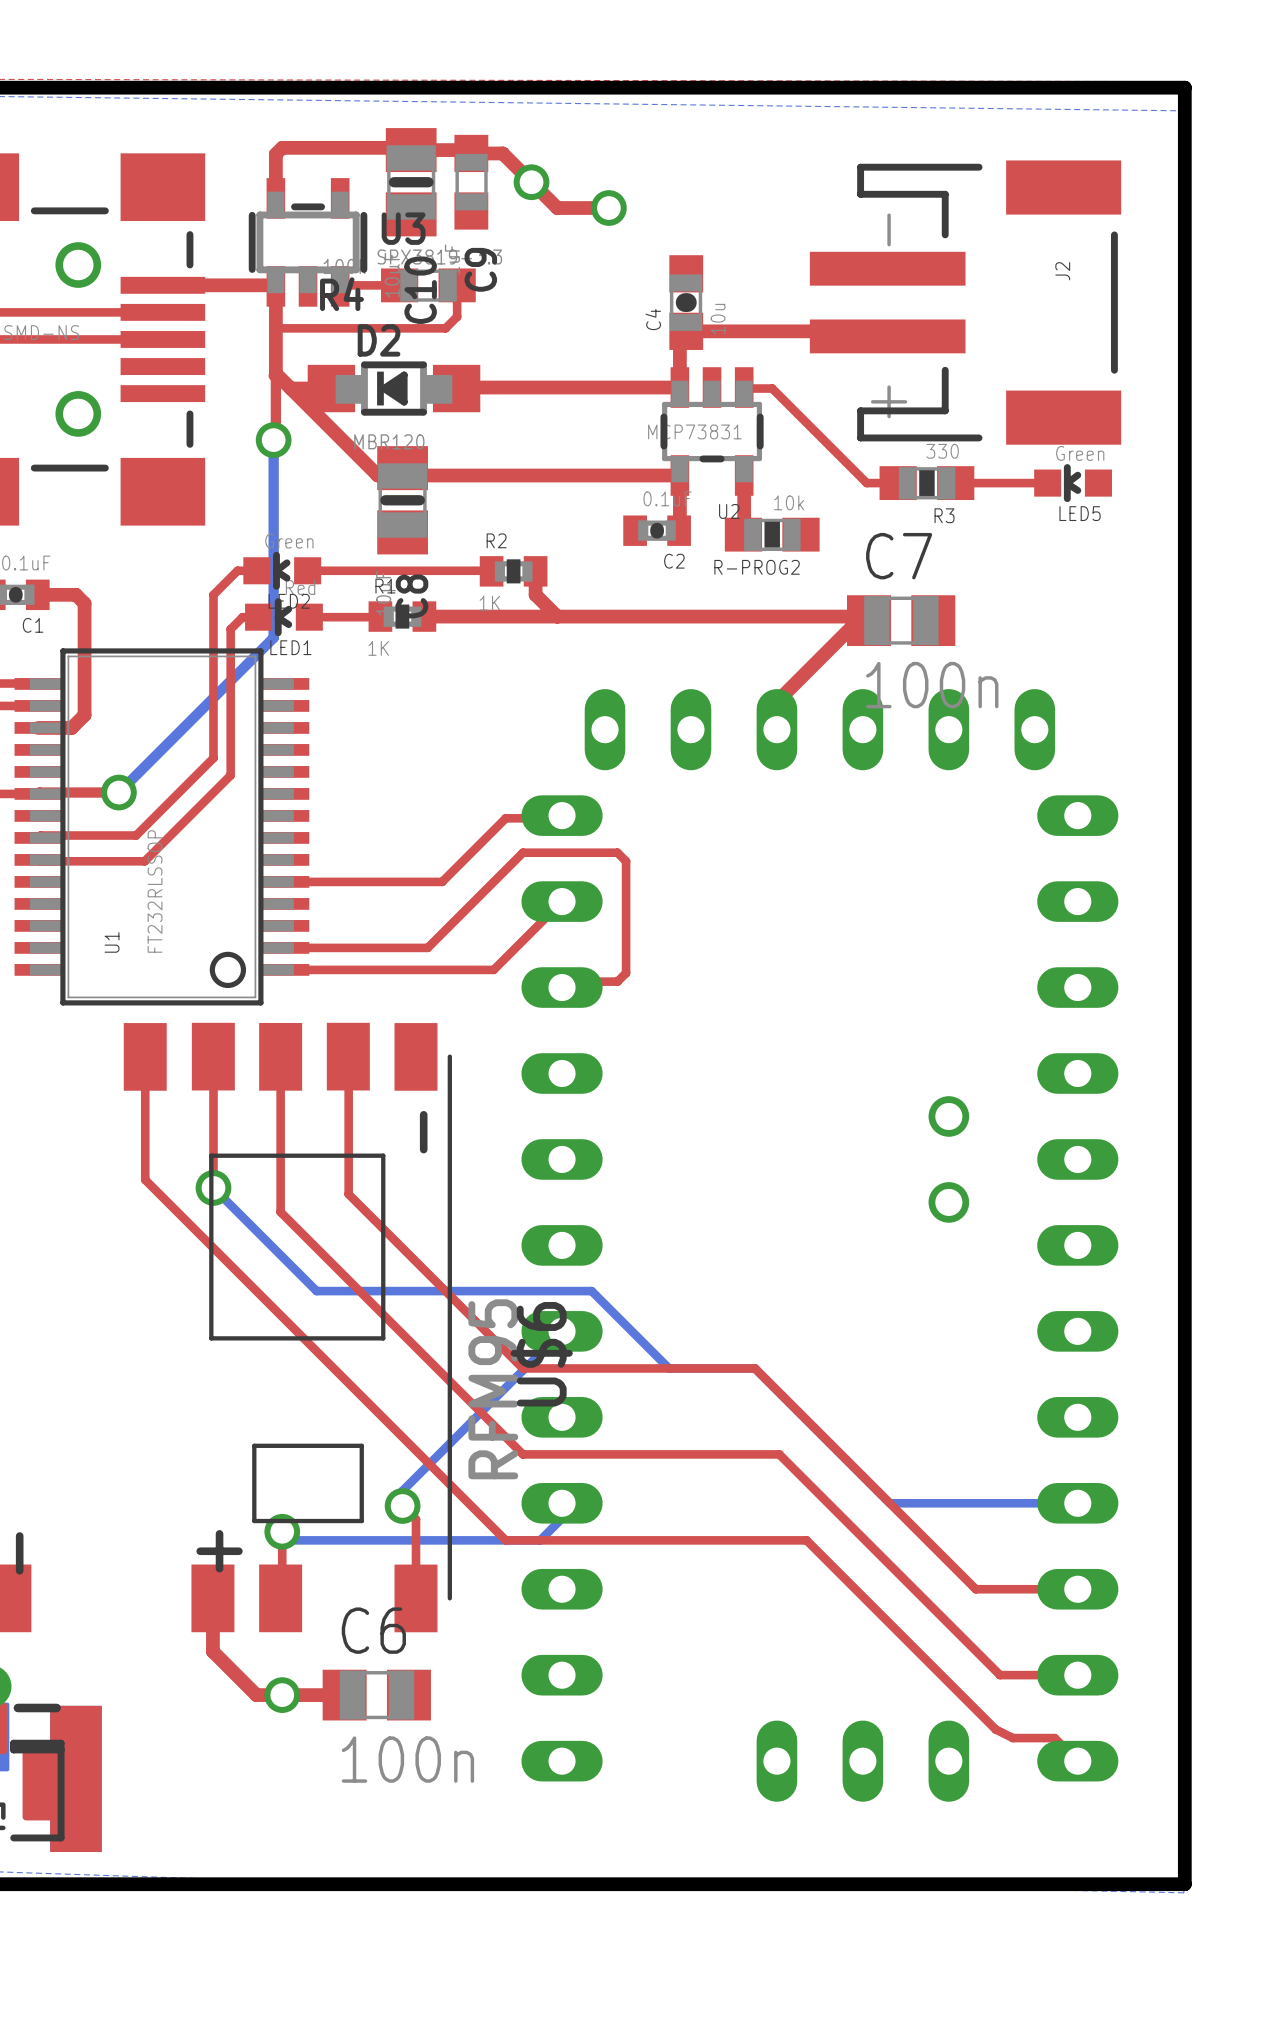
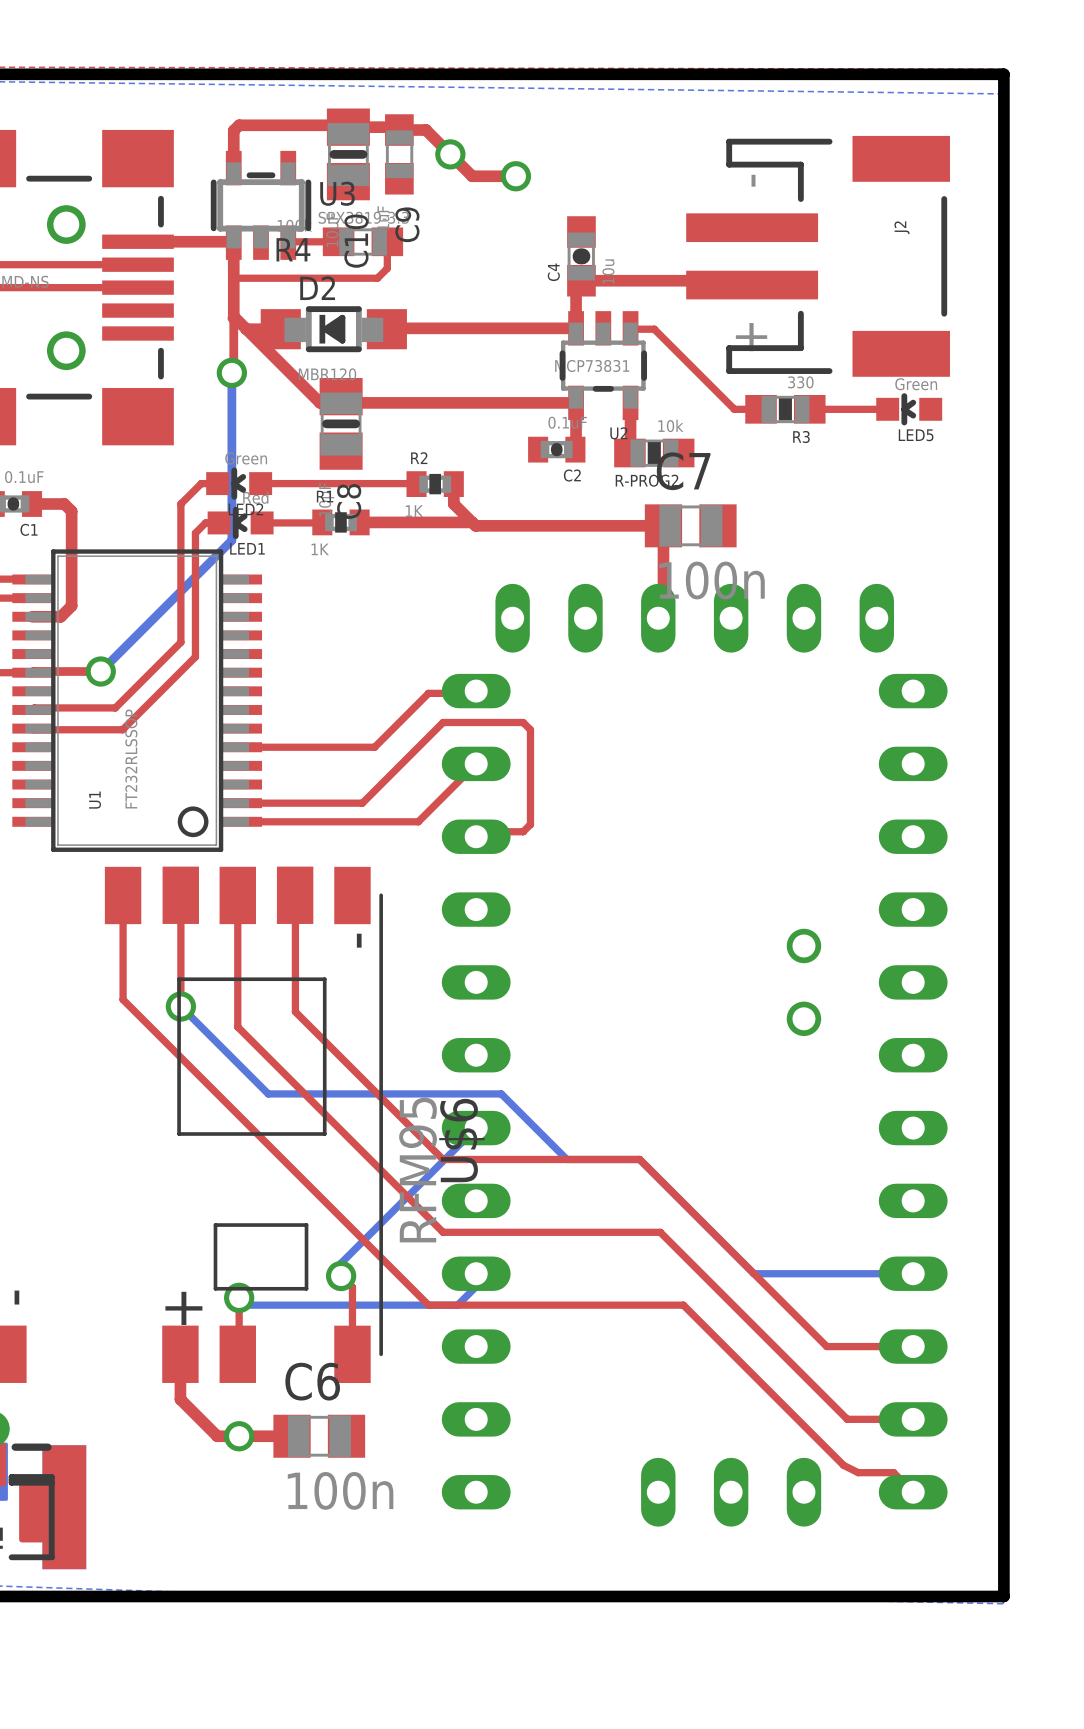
top track: (557, 616) (864, 616) (869, 620) (858, 620) (772, 706) (772, 724) (776, 729) -> (472, 522) (475, 525) (663, 525) (663, 613) (658, 618)
C7 position: (901, 620) -> (690, 525)

